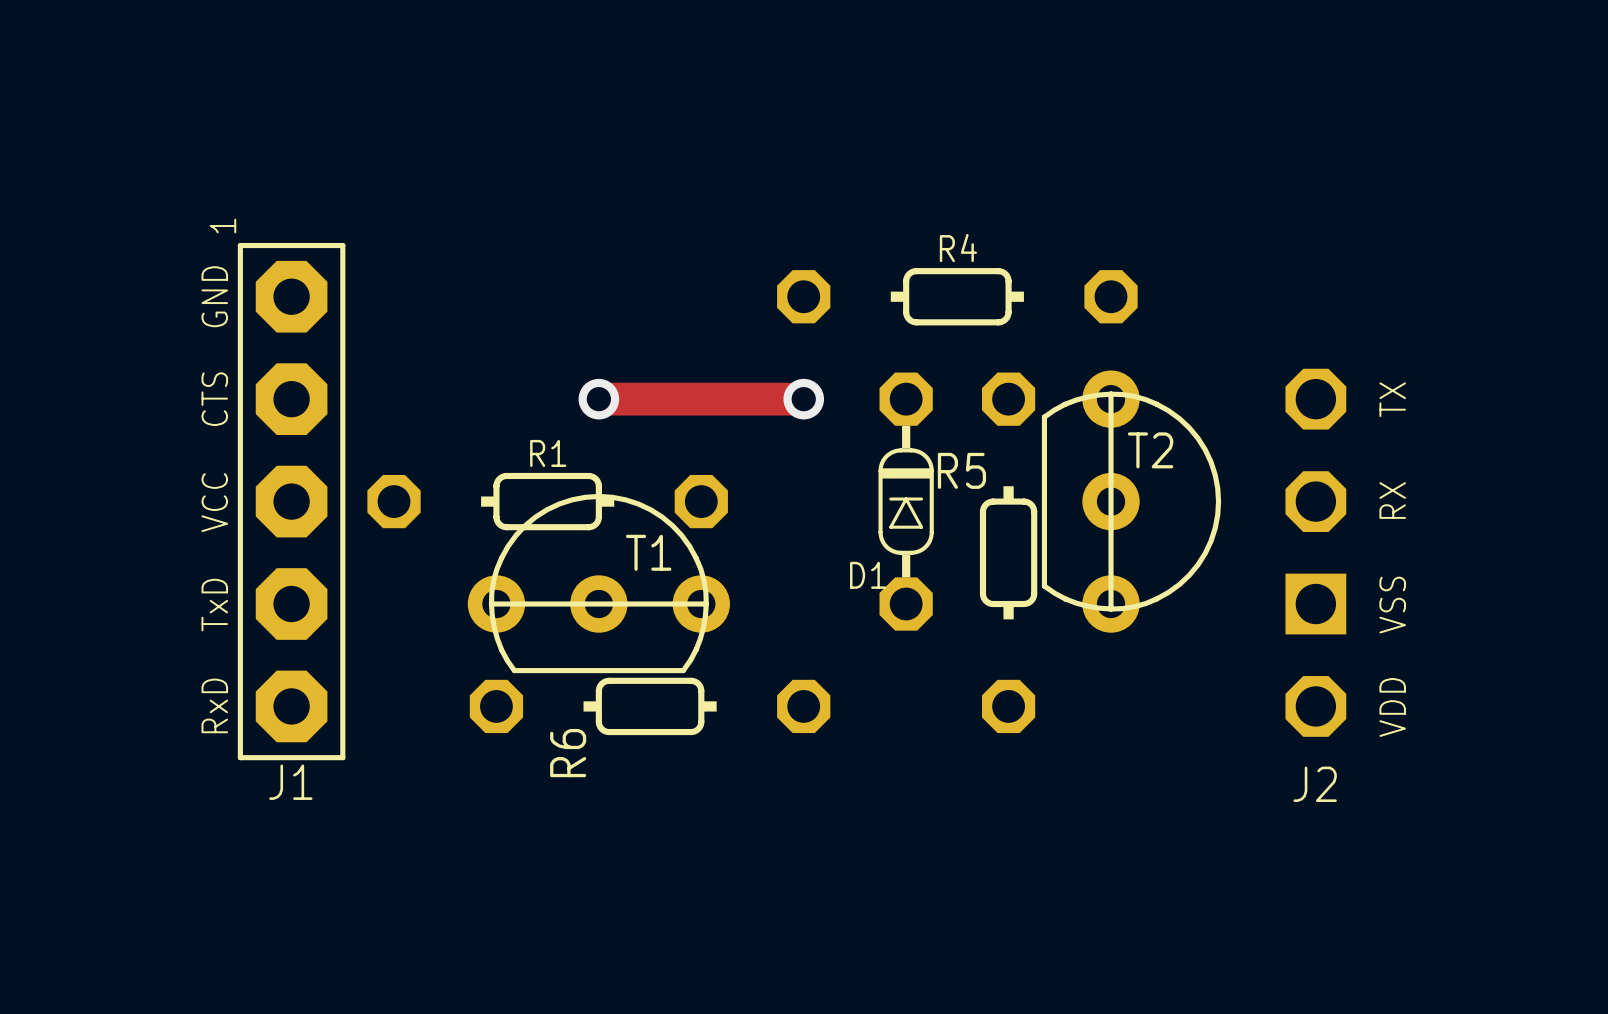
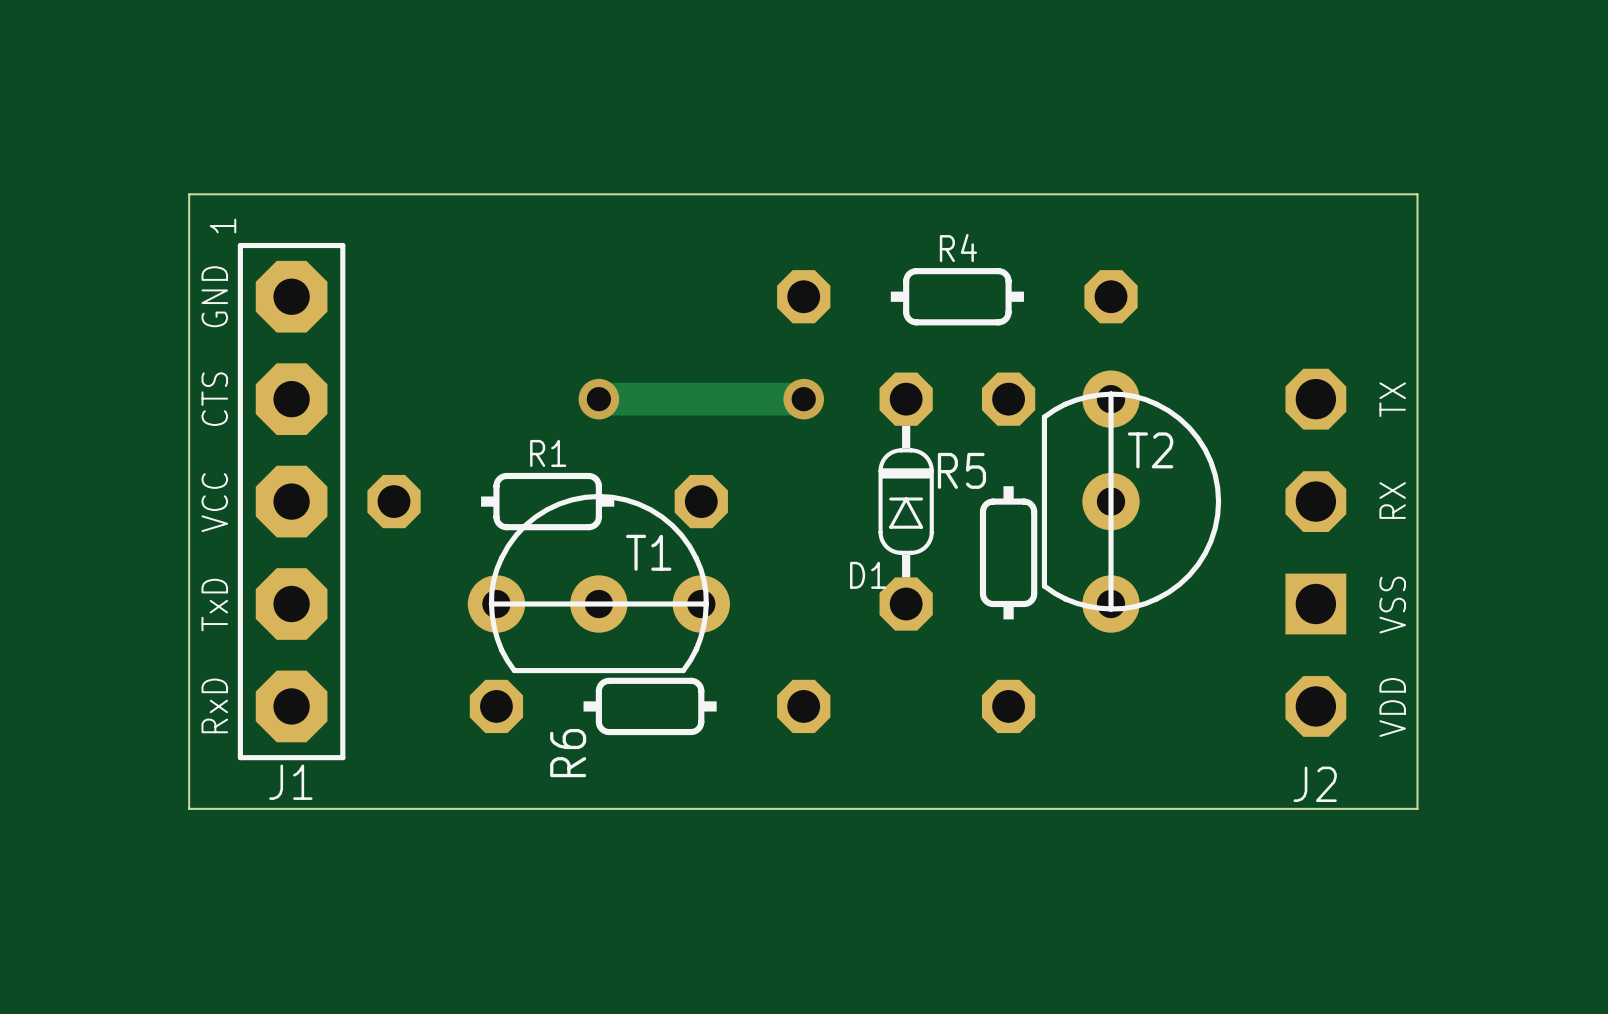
board edge: none -> (189, 194) (1417, 194) (1417, 808) (189, 808) (189, 194)

